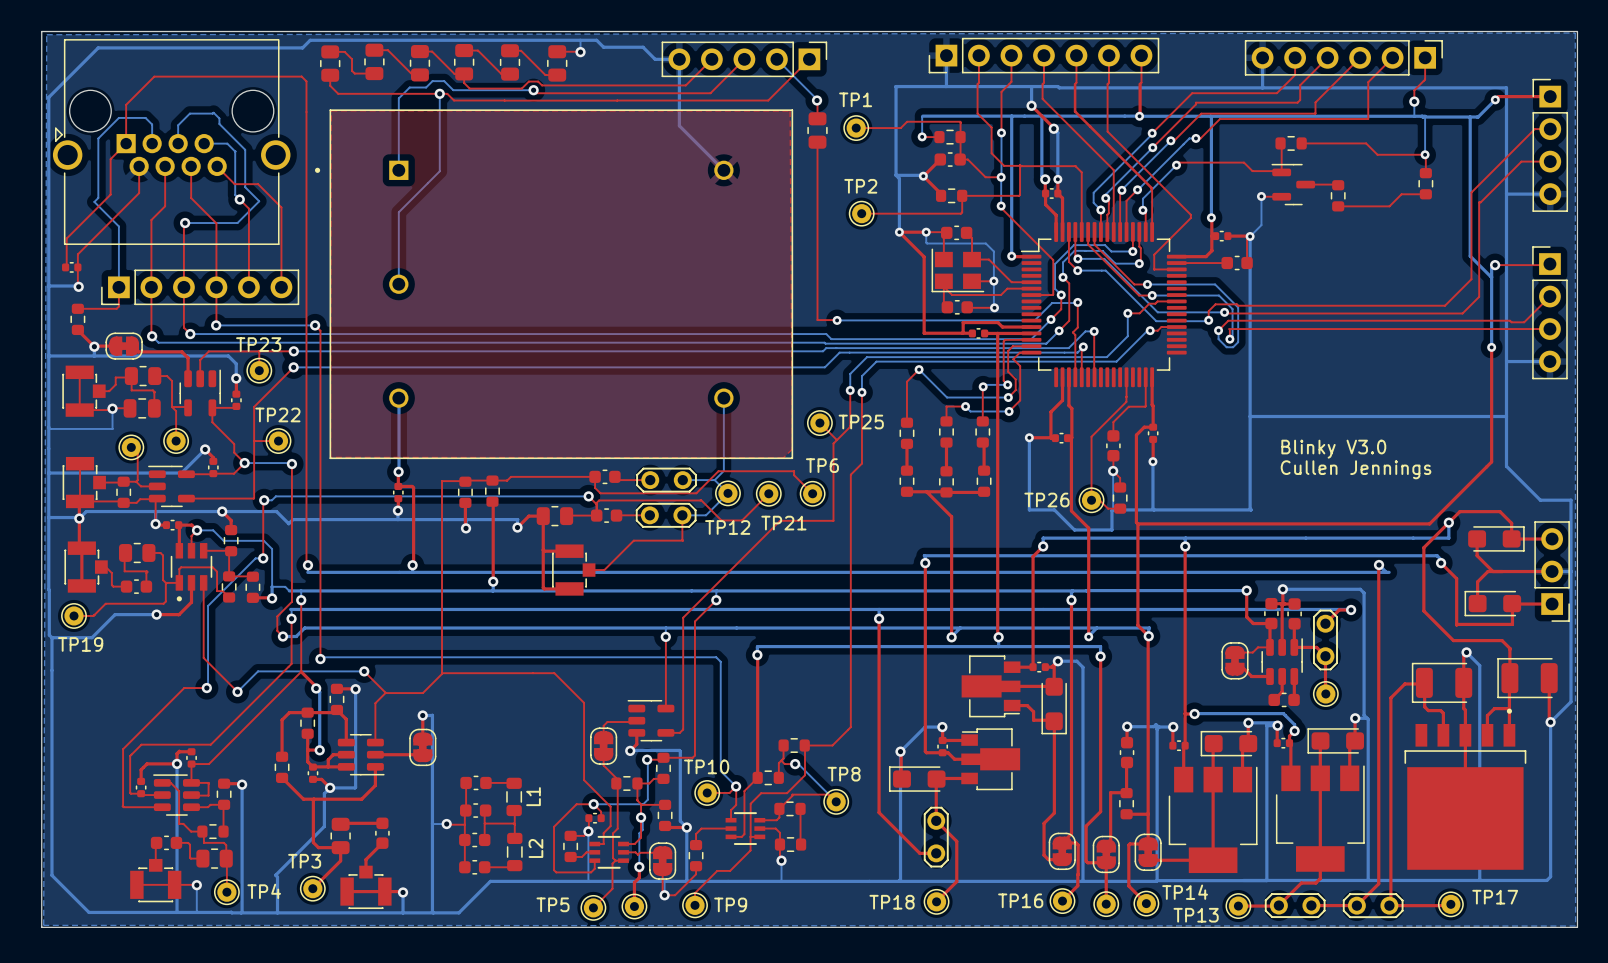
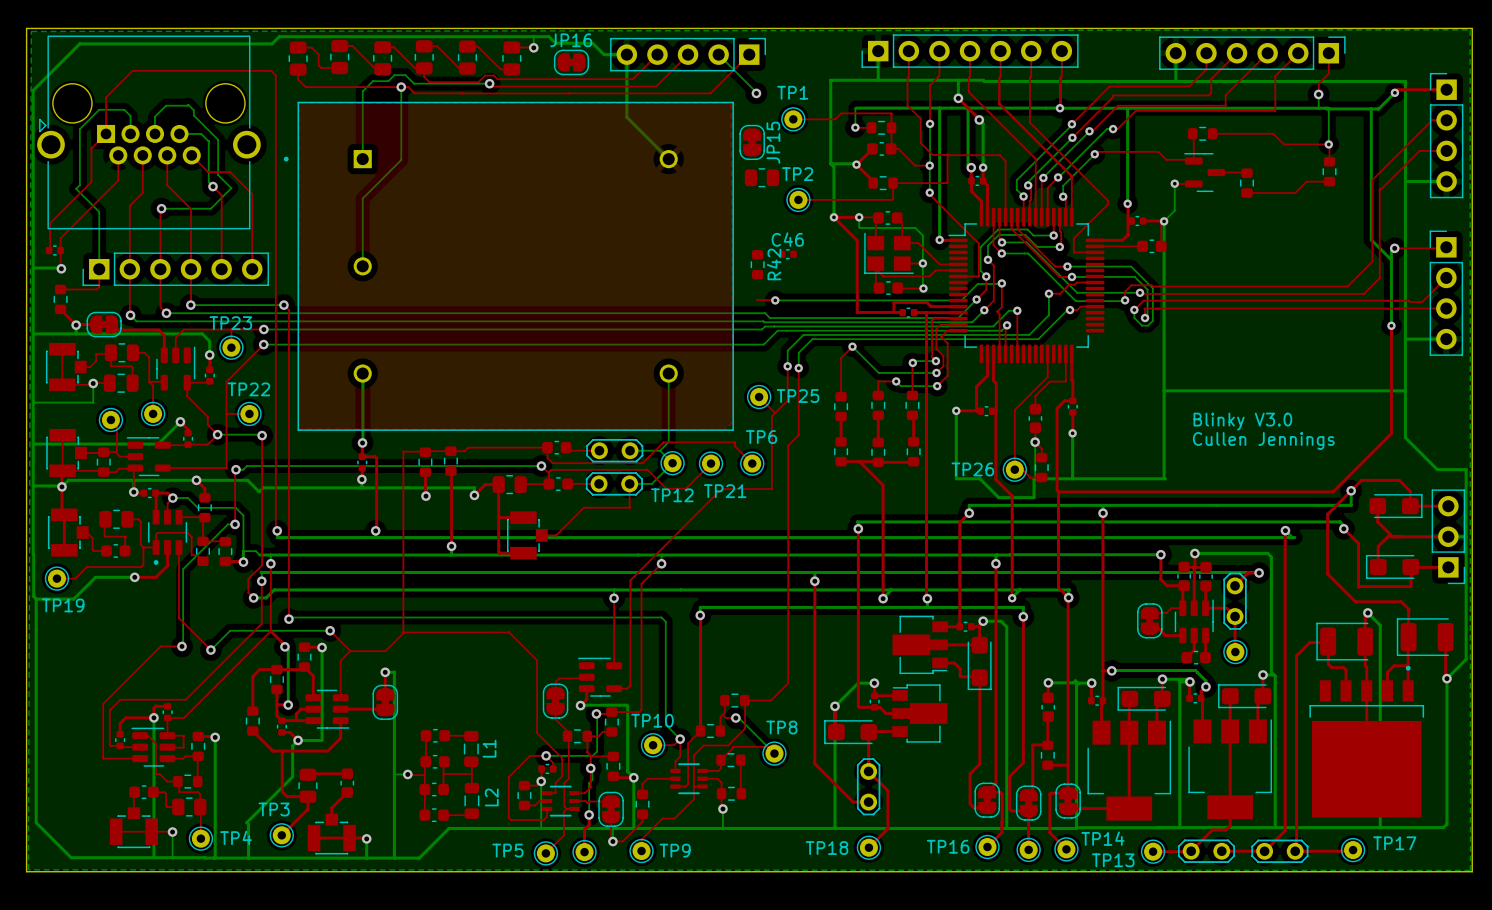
JP16: none -> (571, 62)
top track: (817, 100) (817, 118) -> none
part rotation: 0° (817, 130) -> 90° clockwise (761, 177)
part position: (817, 130) -> (761, 177)
top track: (817, 142) (817, 320) -> none
JP15: none -> (752, 142)
C46: none -> (787, 254)
R42: none -> (757, 264)

